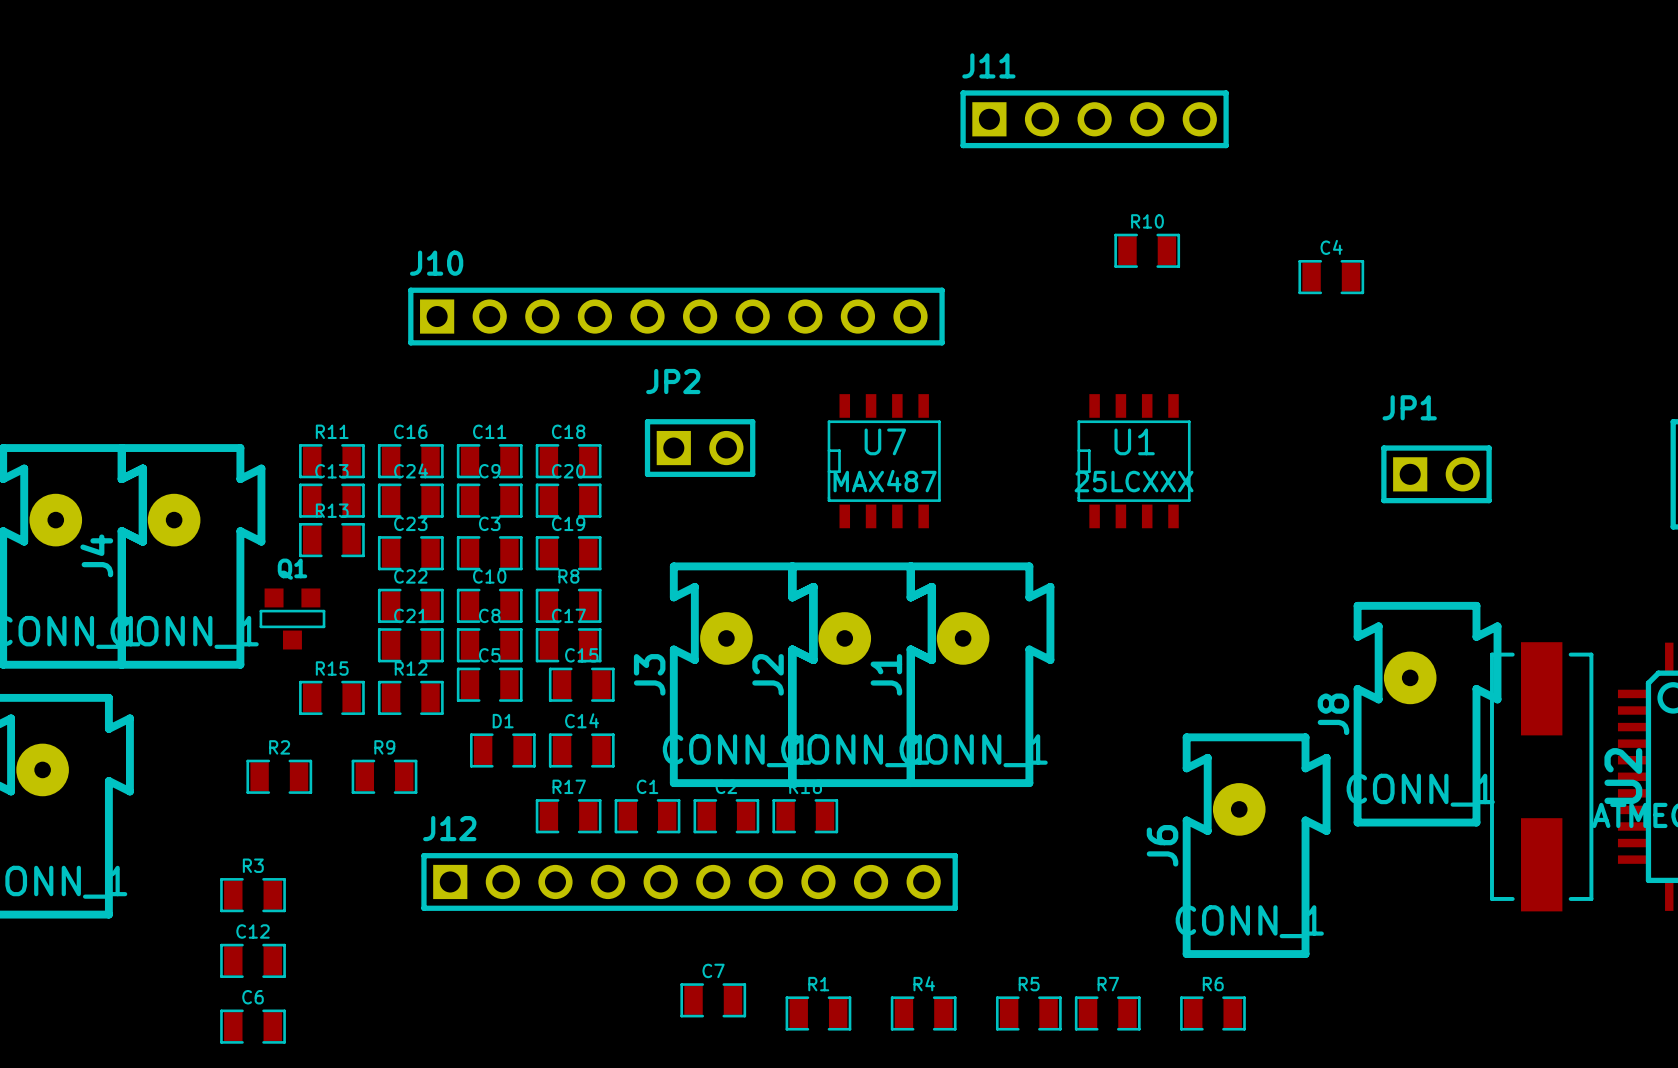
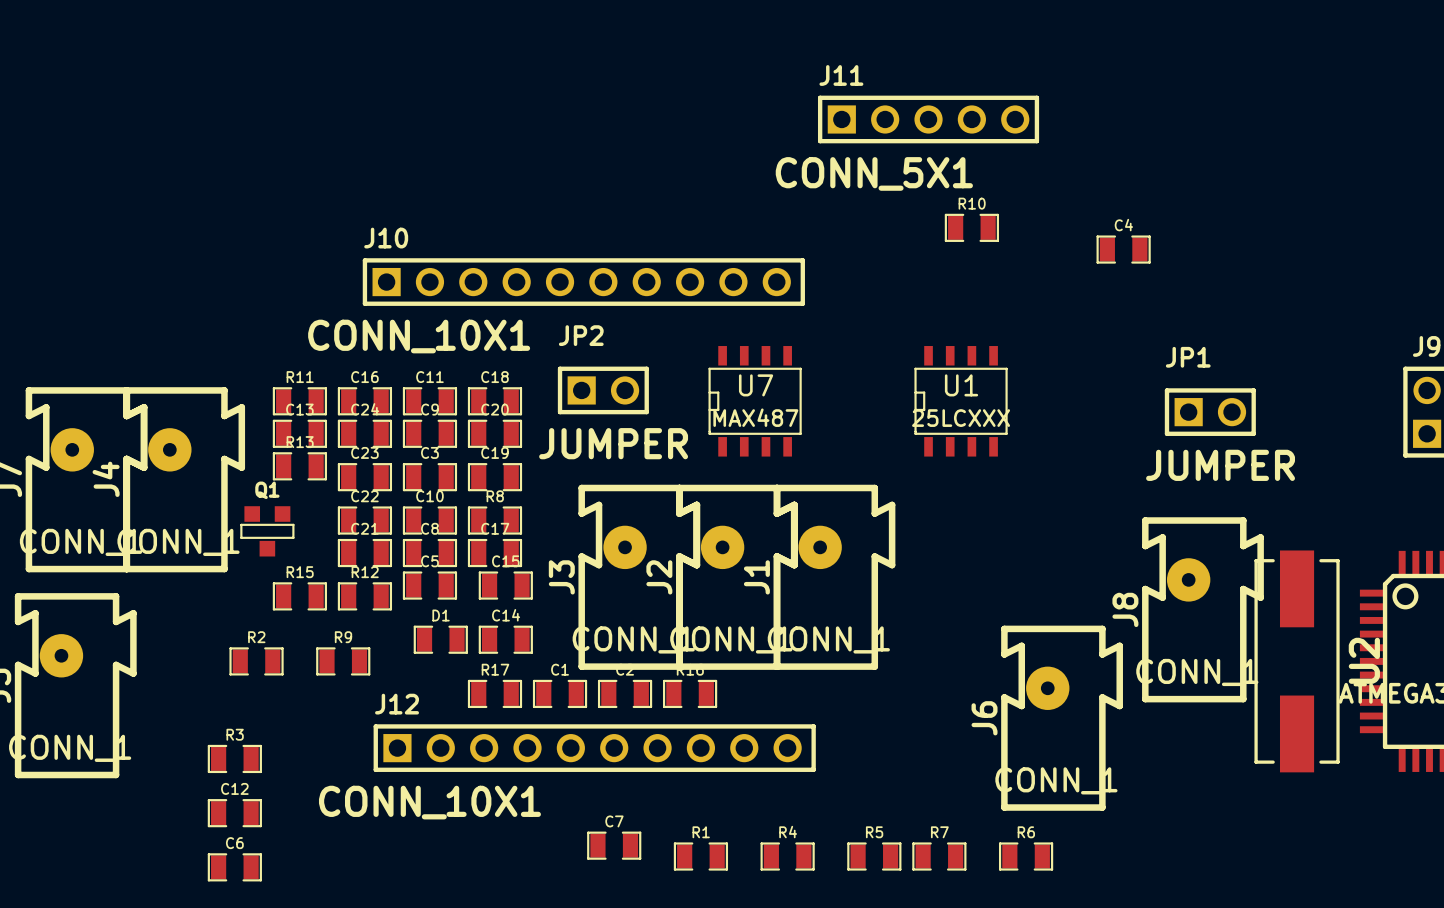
J11 value: none -> CONN_5X1 (874, 173)
J10 value: none -> CONN_10X1 (419, 336)
JP2 value: none -> JUMPER (613, 443)
JP1 value: none -> JUMPER (1220, 465)
J12 value: none -> CONN_10X1 (429, 802)

